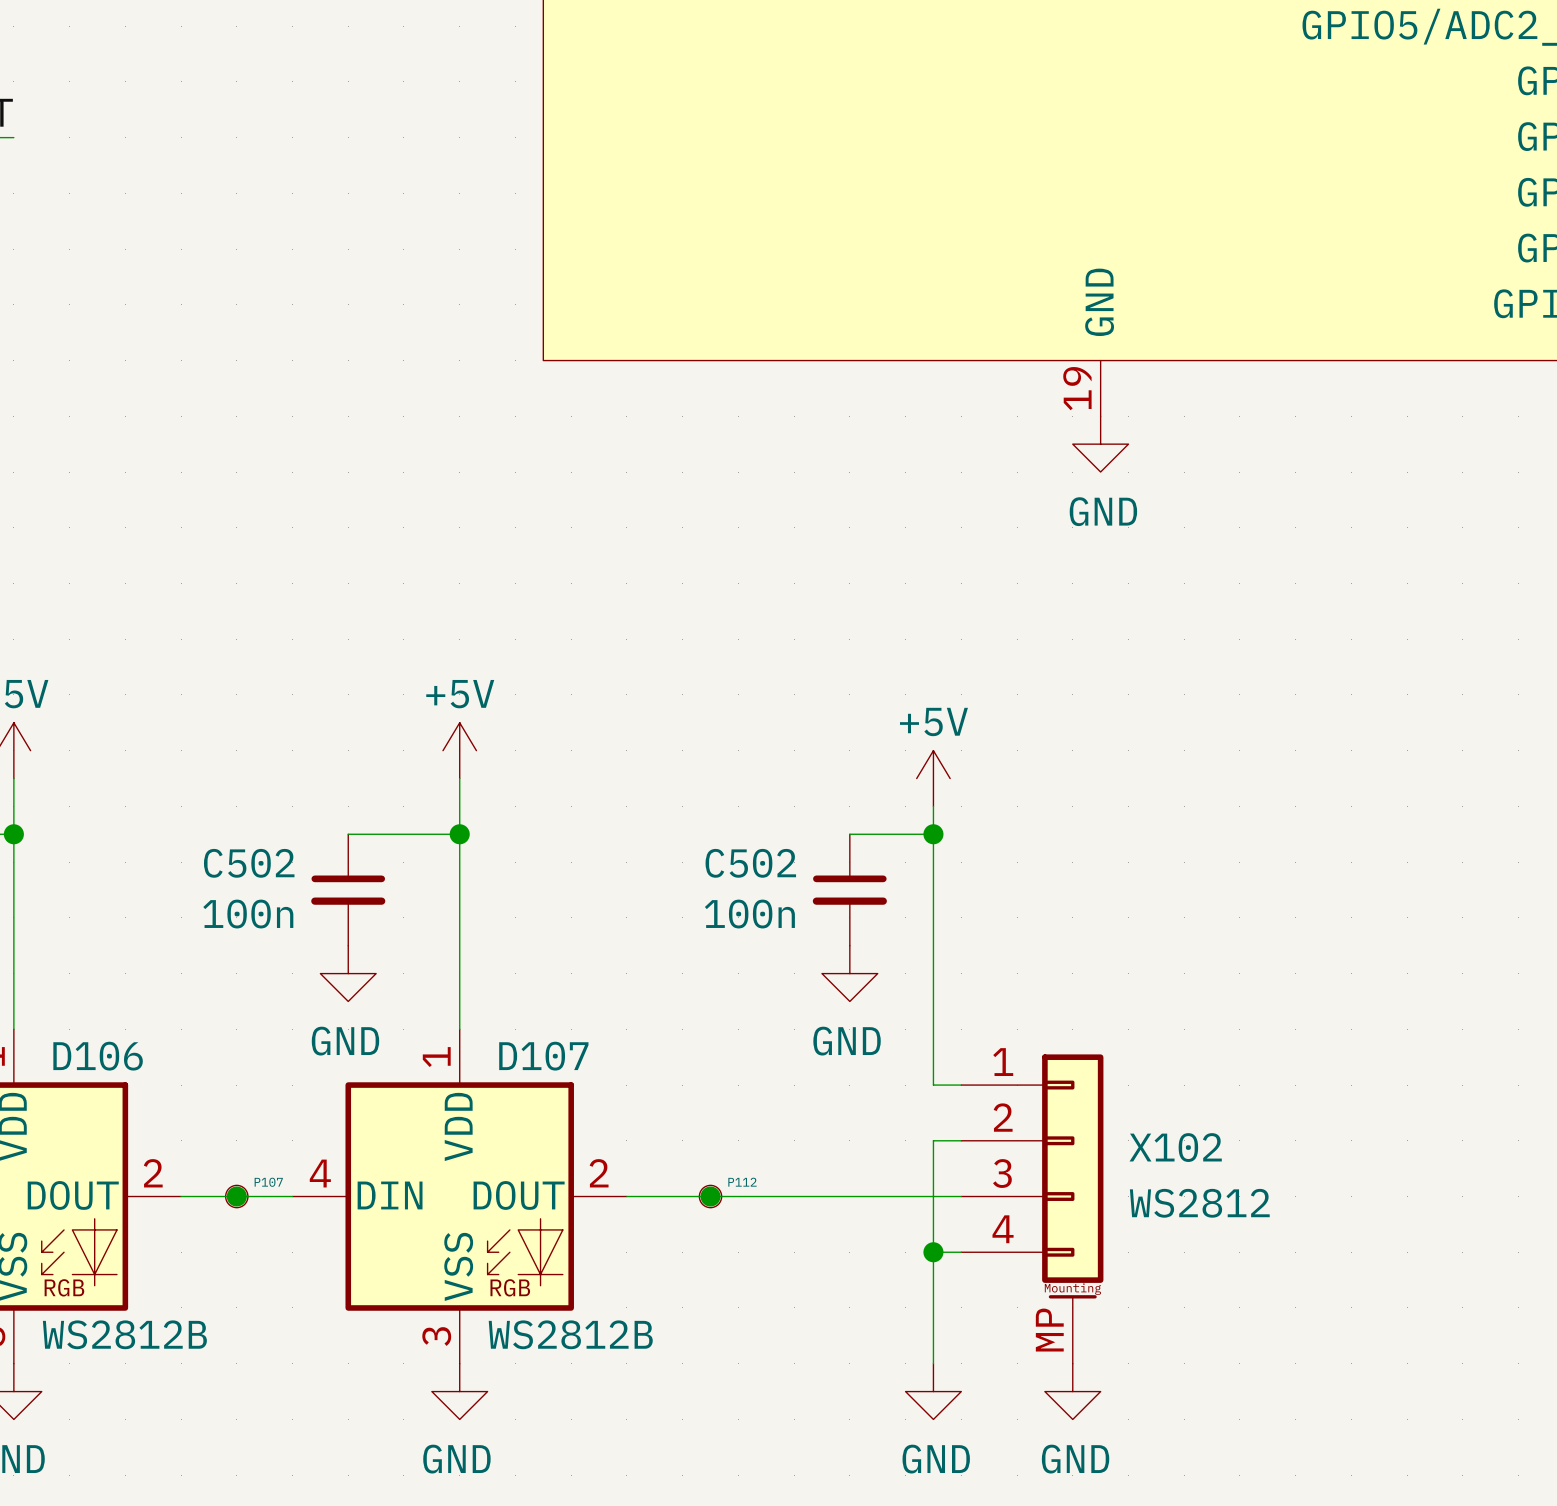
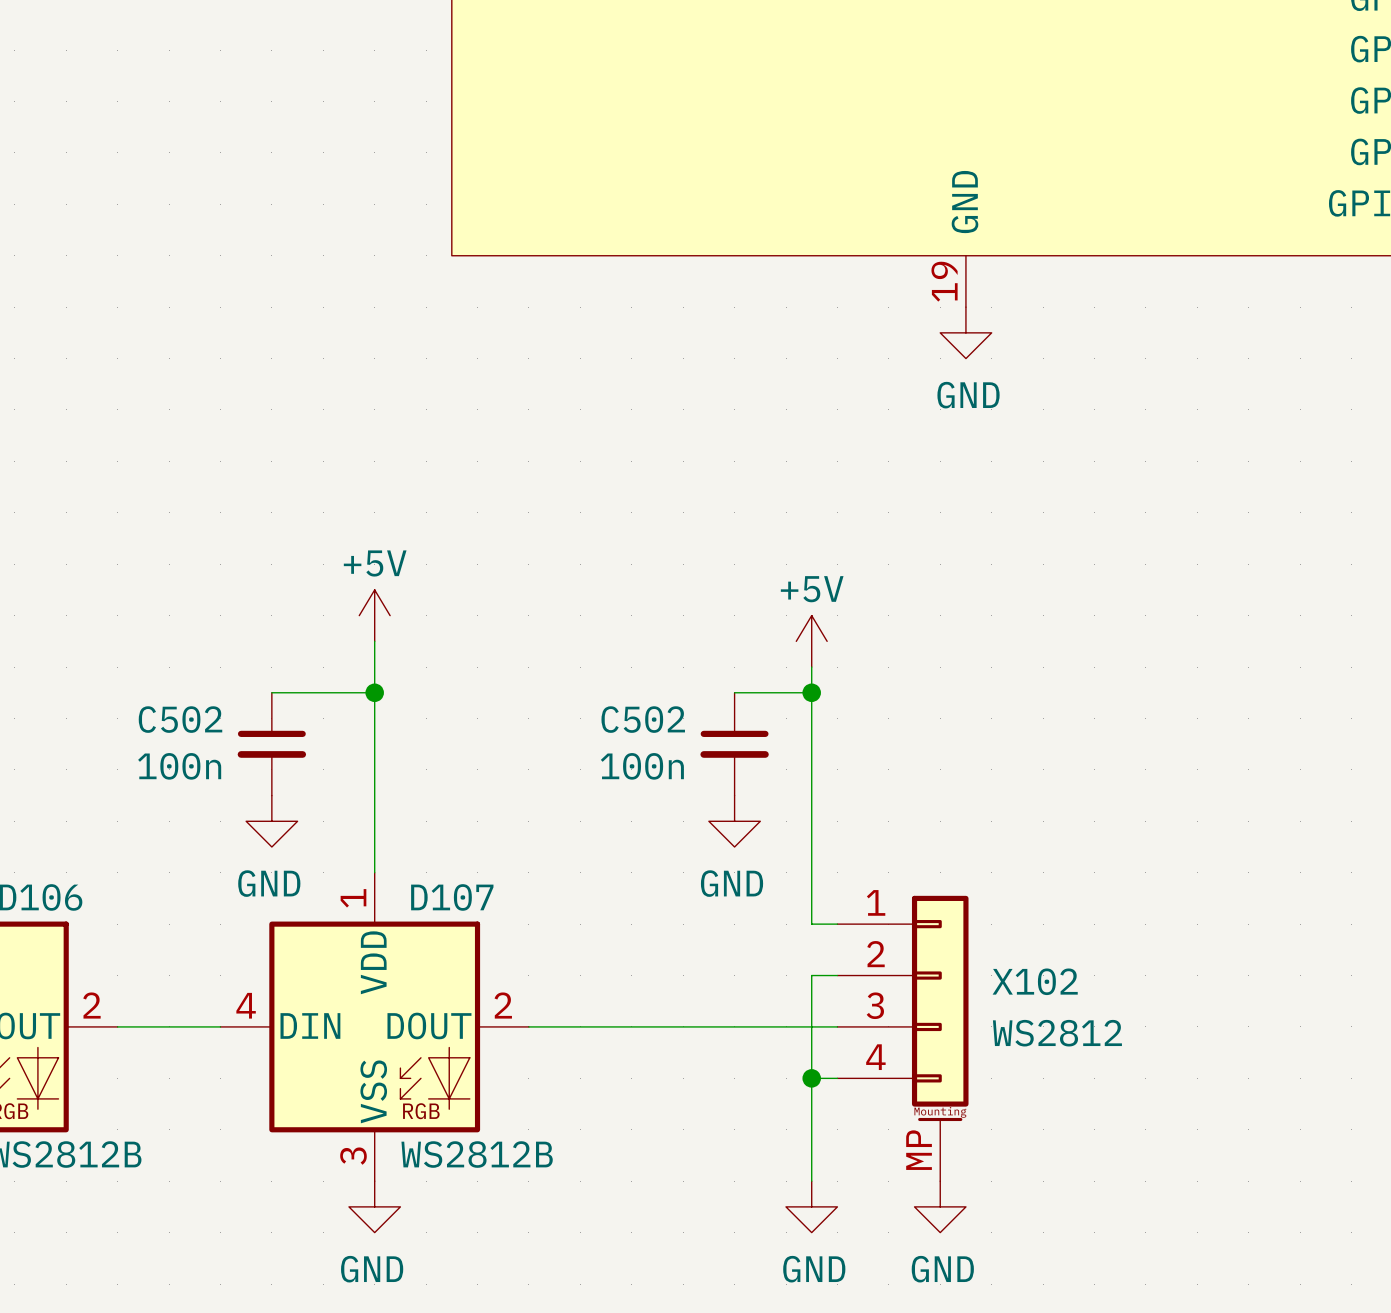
junction: (236, 1196) -> none
P107: (236, 1196) -> none
junction: (710, 1196) -> none
P112: (710, 1196) -> none

